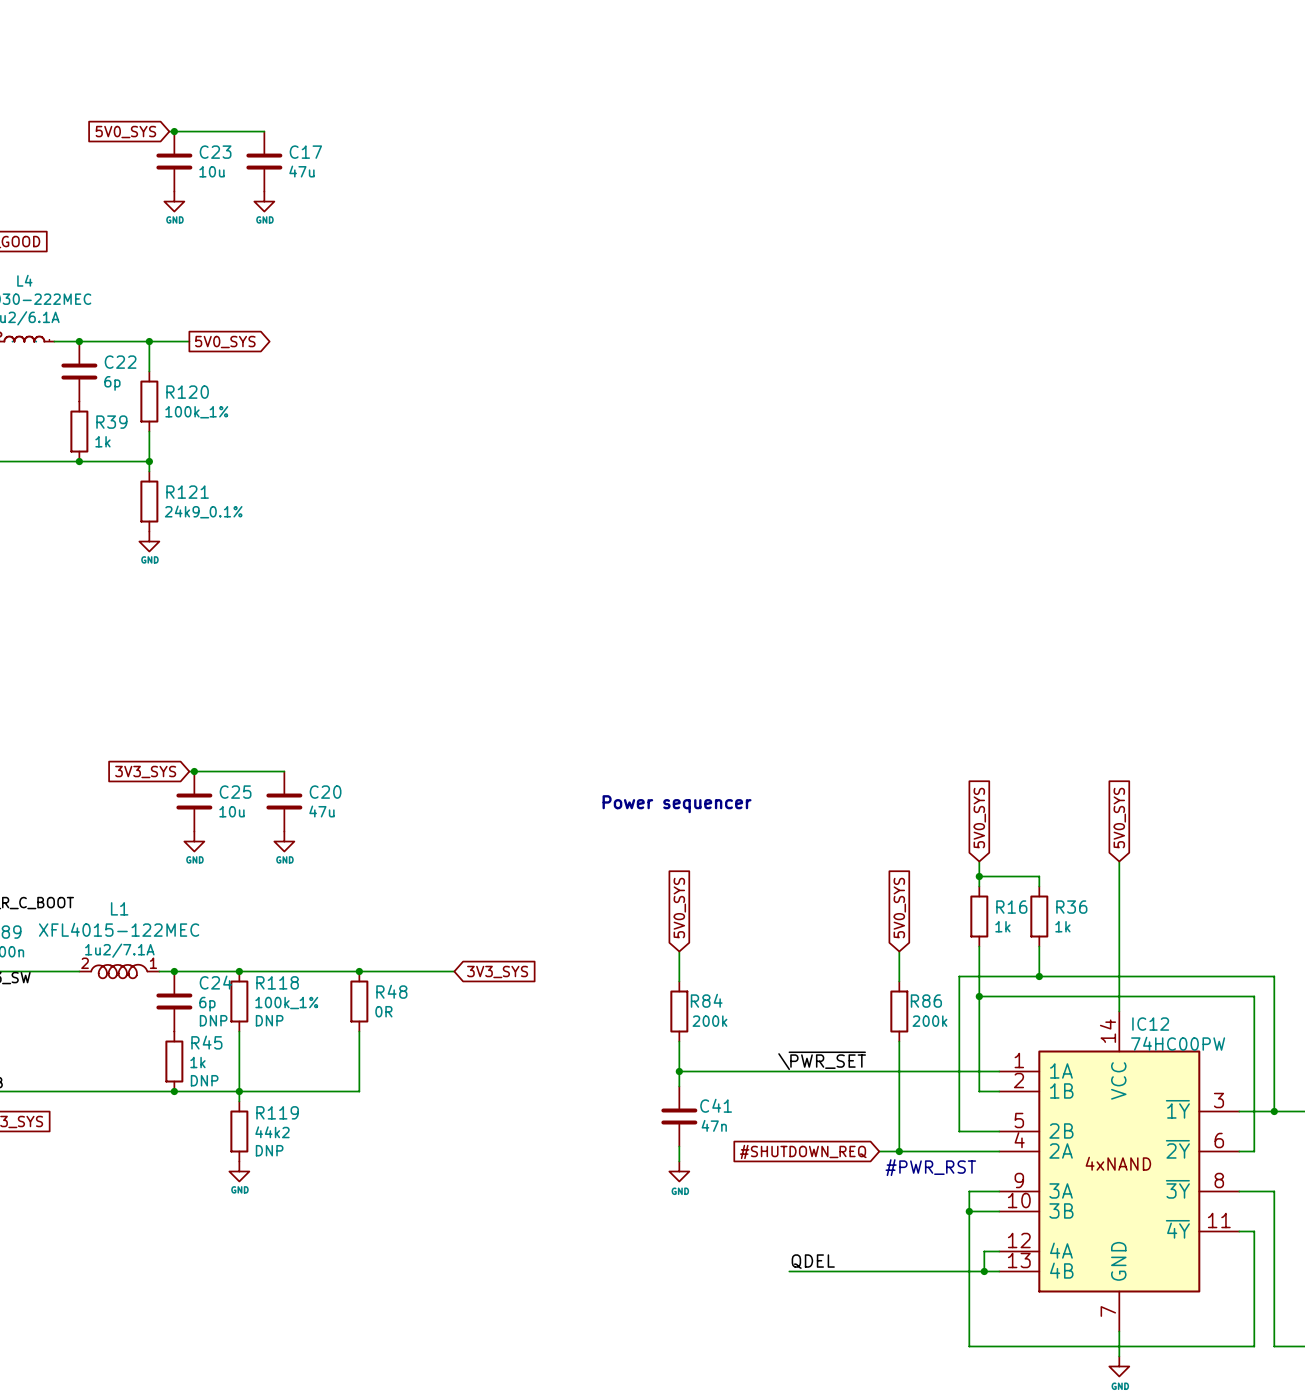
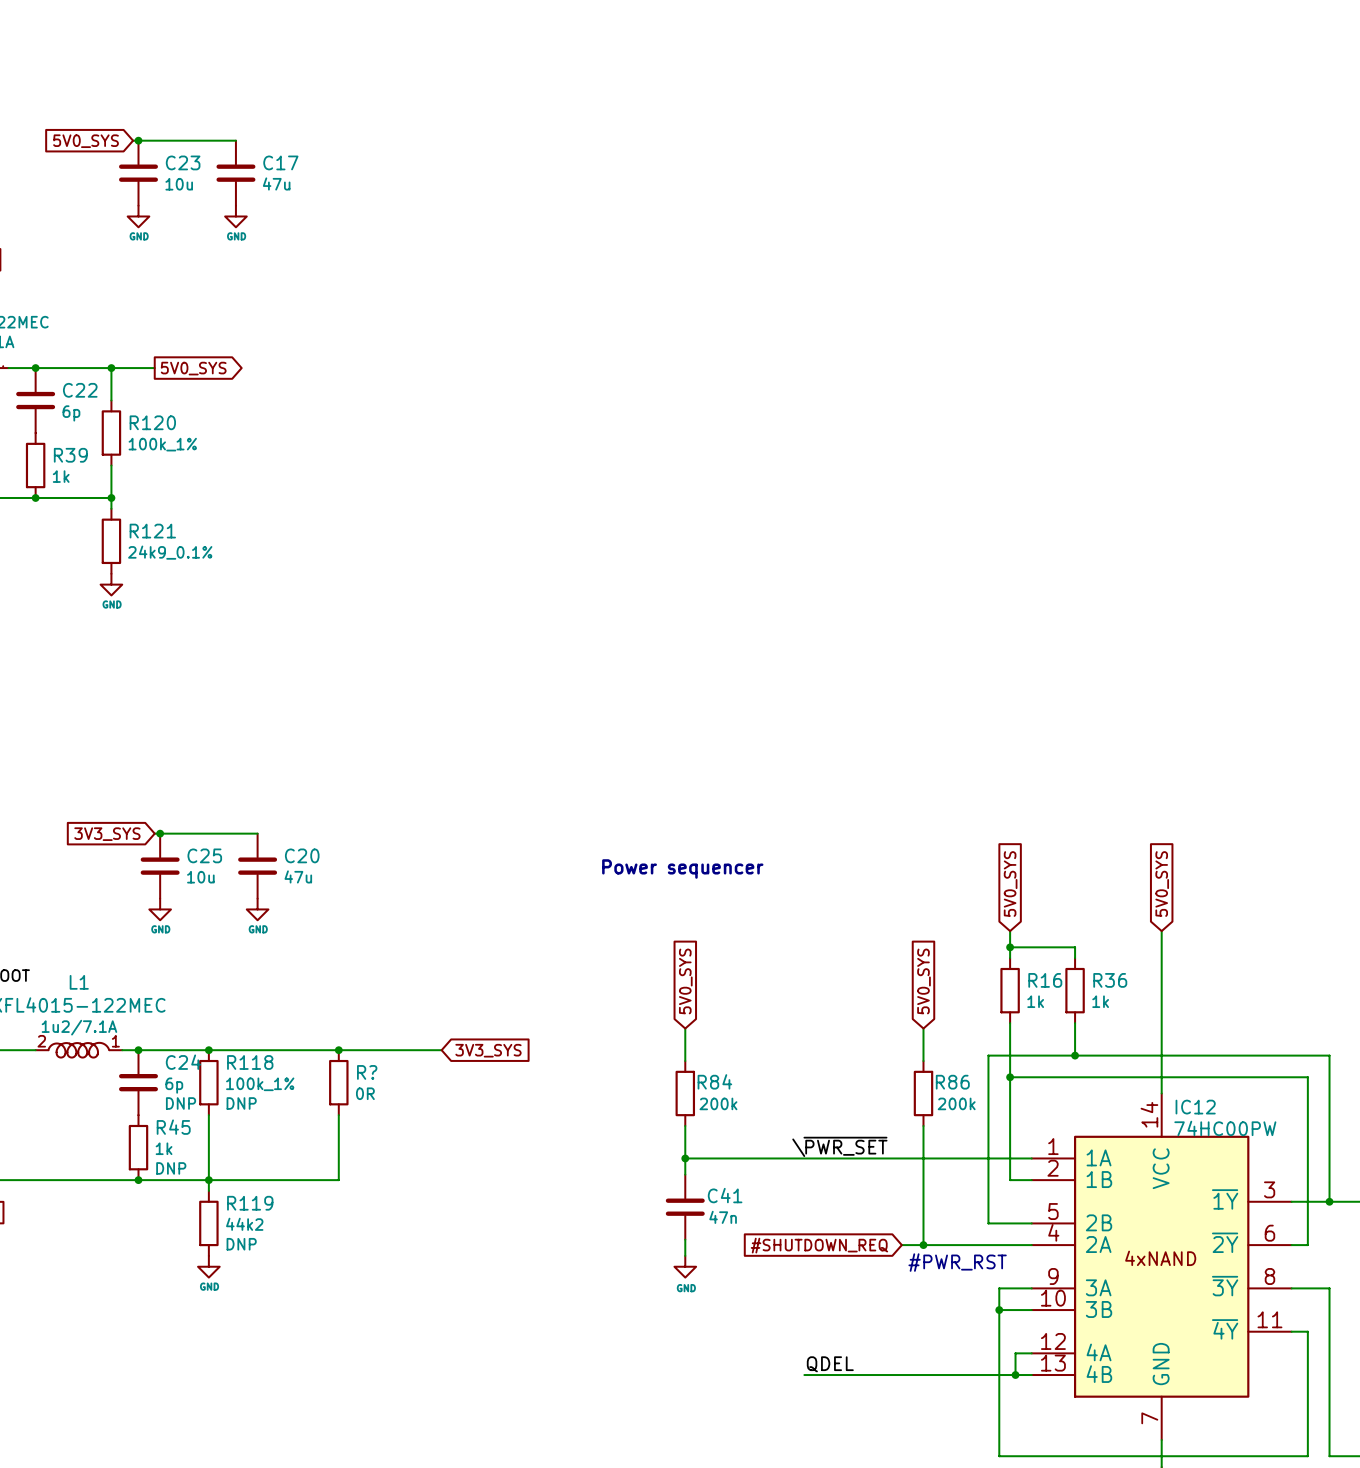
R48 name: R48 (391, 991) -> R? (367, 1072)

